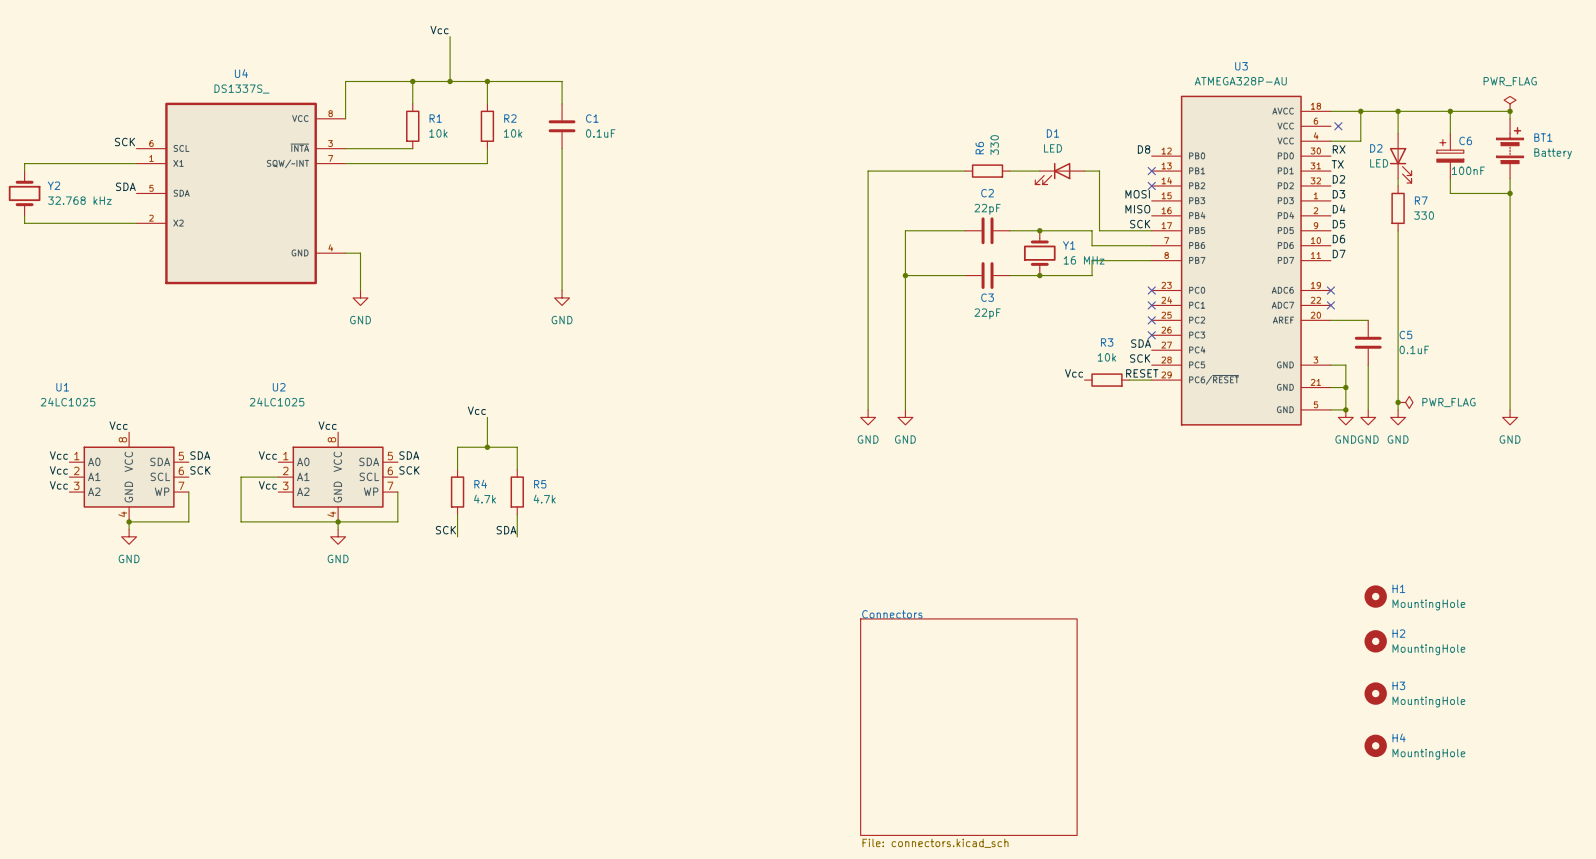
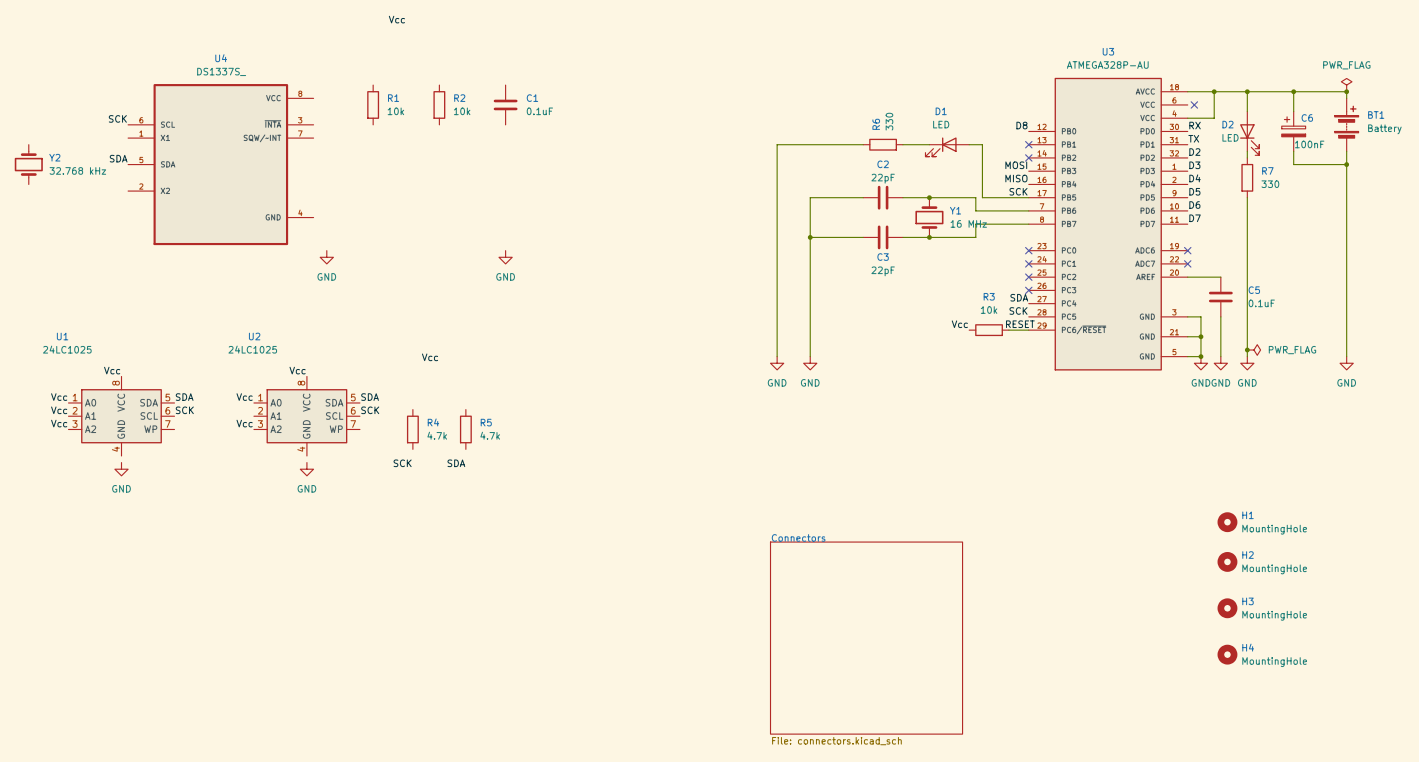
wire: (450, 36) (450, 81) -> none
wire: (412, 81) (412, 103) -> none
junction: (412, 81) -> none
junction: (450, 81) -> none
wire: (487, 81) (487, 103) -> none
junction: (487, 81) -> none
wire: (562, 103) (562, 81) (345, 81) (345, 118) -> none
wire: (345, 148) (412, 148) -> none
wire: (487, 148) (487, 163) (345, 163) -> none
wire: (562, 148) (562, 290) -> none
wire: (136, 163) (24, 163) (24, 171) -> none
wire: (24, 215) (24, 223) (136, 223) -> none
wire: (345, 253) (360, 253) (360, 290) -> none
wire: (487, 417) (487, 447) -> none
junction: (487, 447) -> none
wire: (457, 469) (457, 447) (517, 447) (517, 469) -> none
wire: (278, 477) (241, 477) (241, 521) (397, 521) (397, 492) -> none
wire: (188, 492) (188, 521) (129, 521) (129, 529) -> none
wire: (457, 514) (457, 536) -> none
wire: (517, 514) (517, 536) -> none
junction: (129, 521) -> none
wire: (338, 521) (338, 529) -> none
junction: (338, 521) -> none

